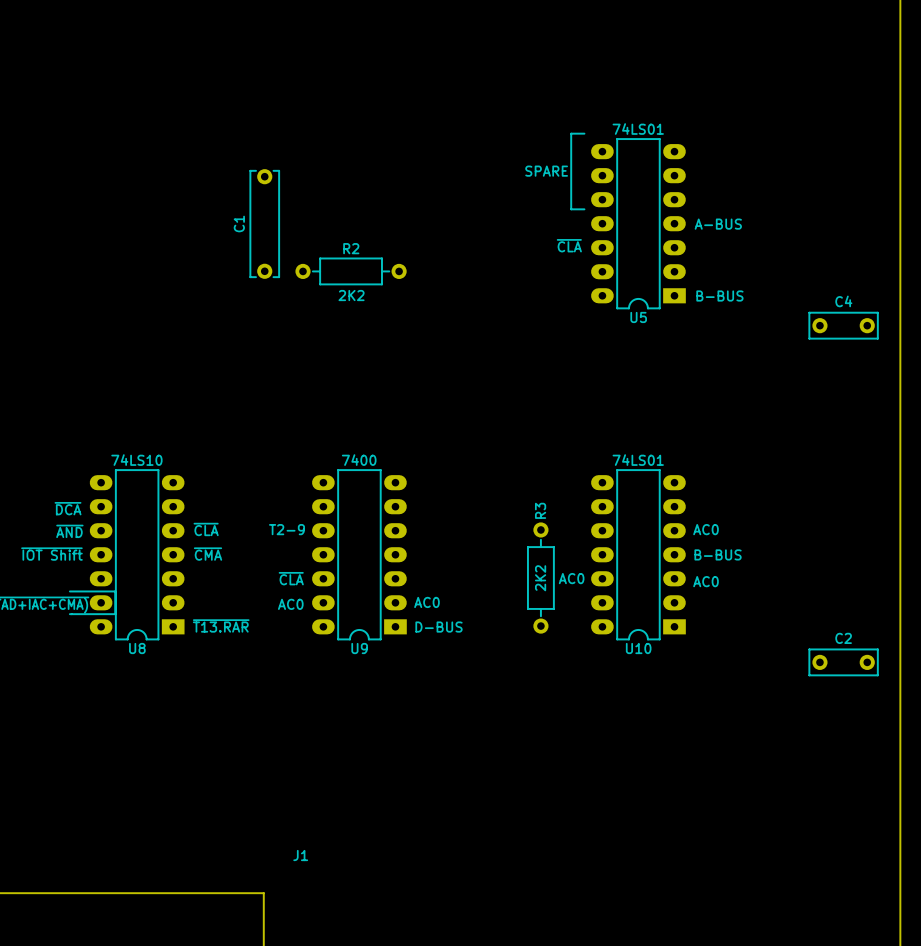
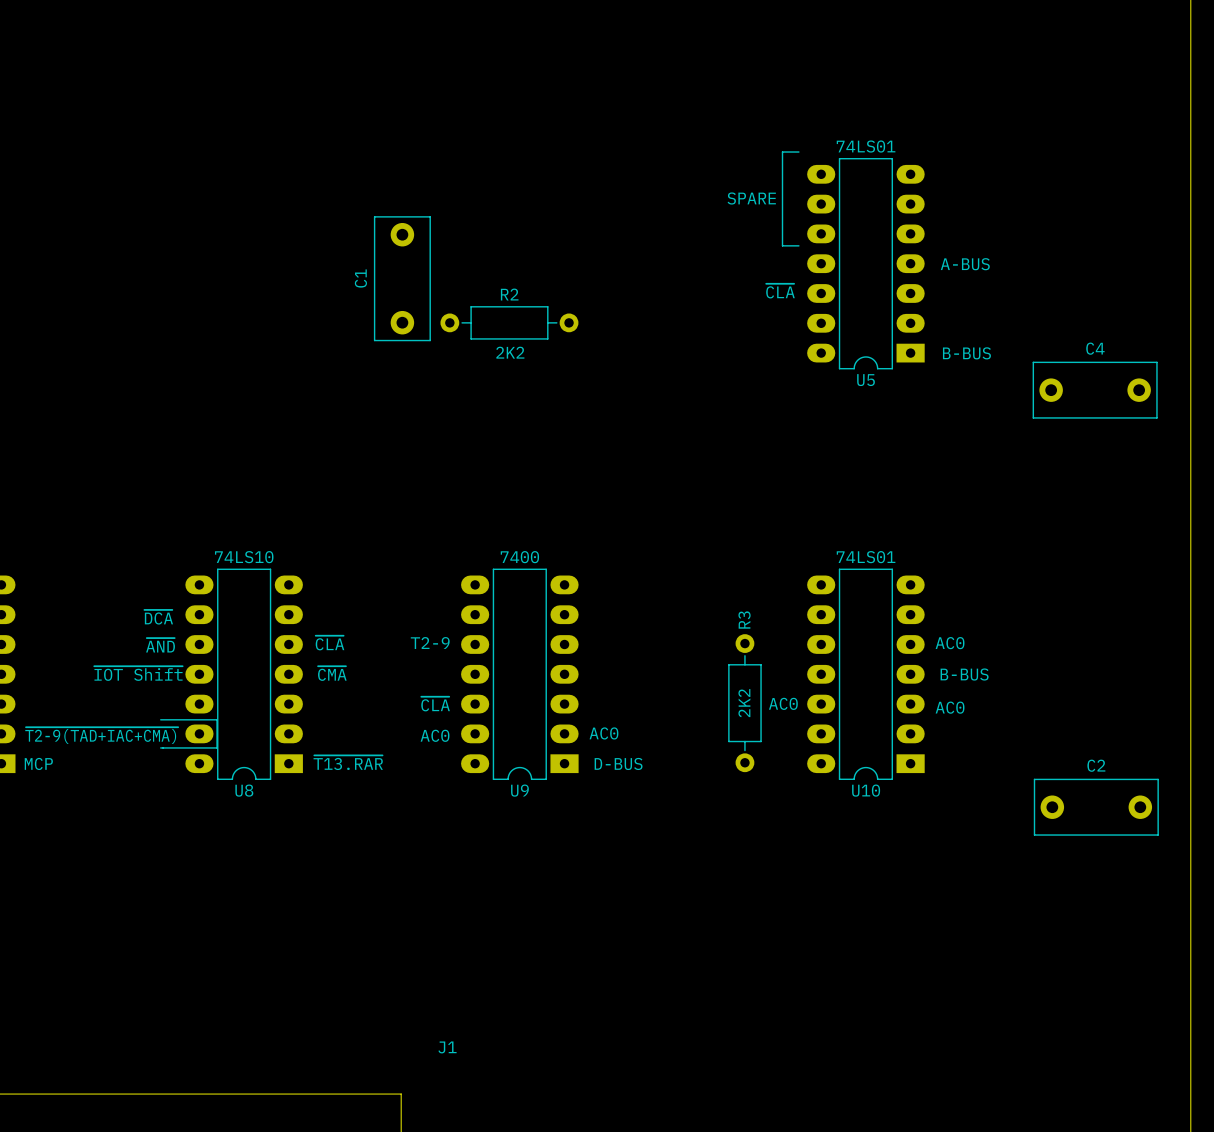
C1 footprint: [249, 169, 280, 279] -> [373, 216, 431, 342]
C4 footprint: [808, 312, 879, 340] -> [1032, 361, 1158, 419]
C2 footprint: [808, 648, 879, 676] -> [1033, 778, 1159, 836]

